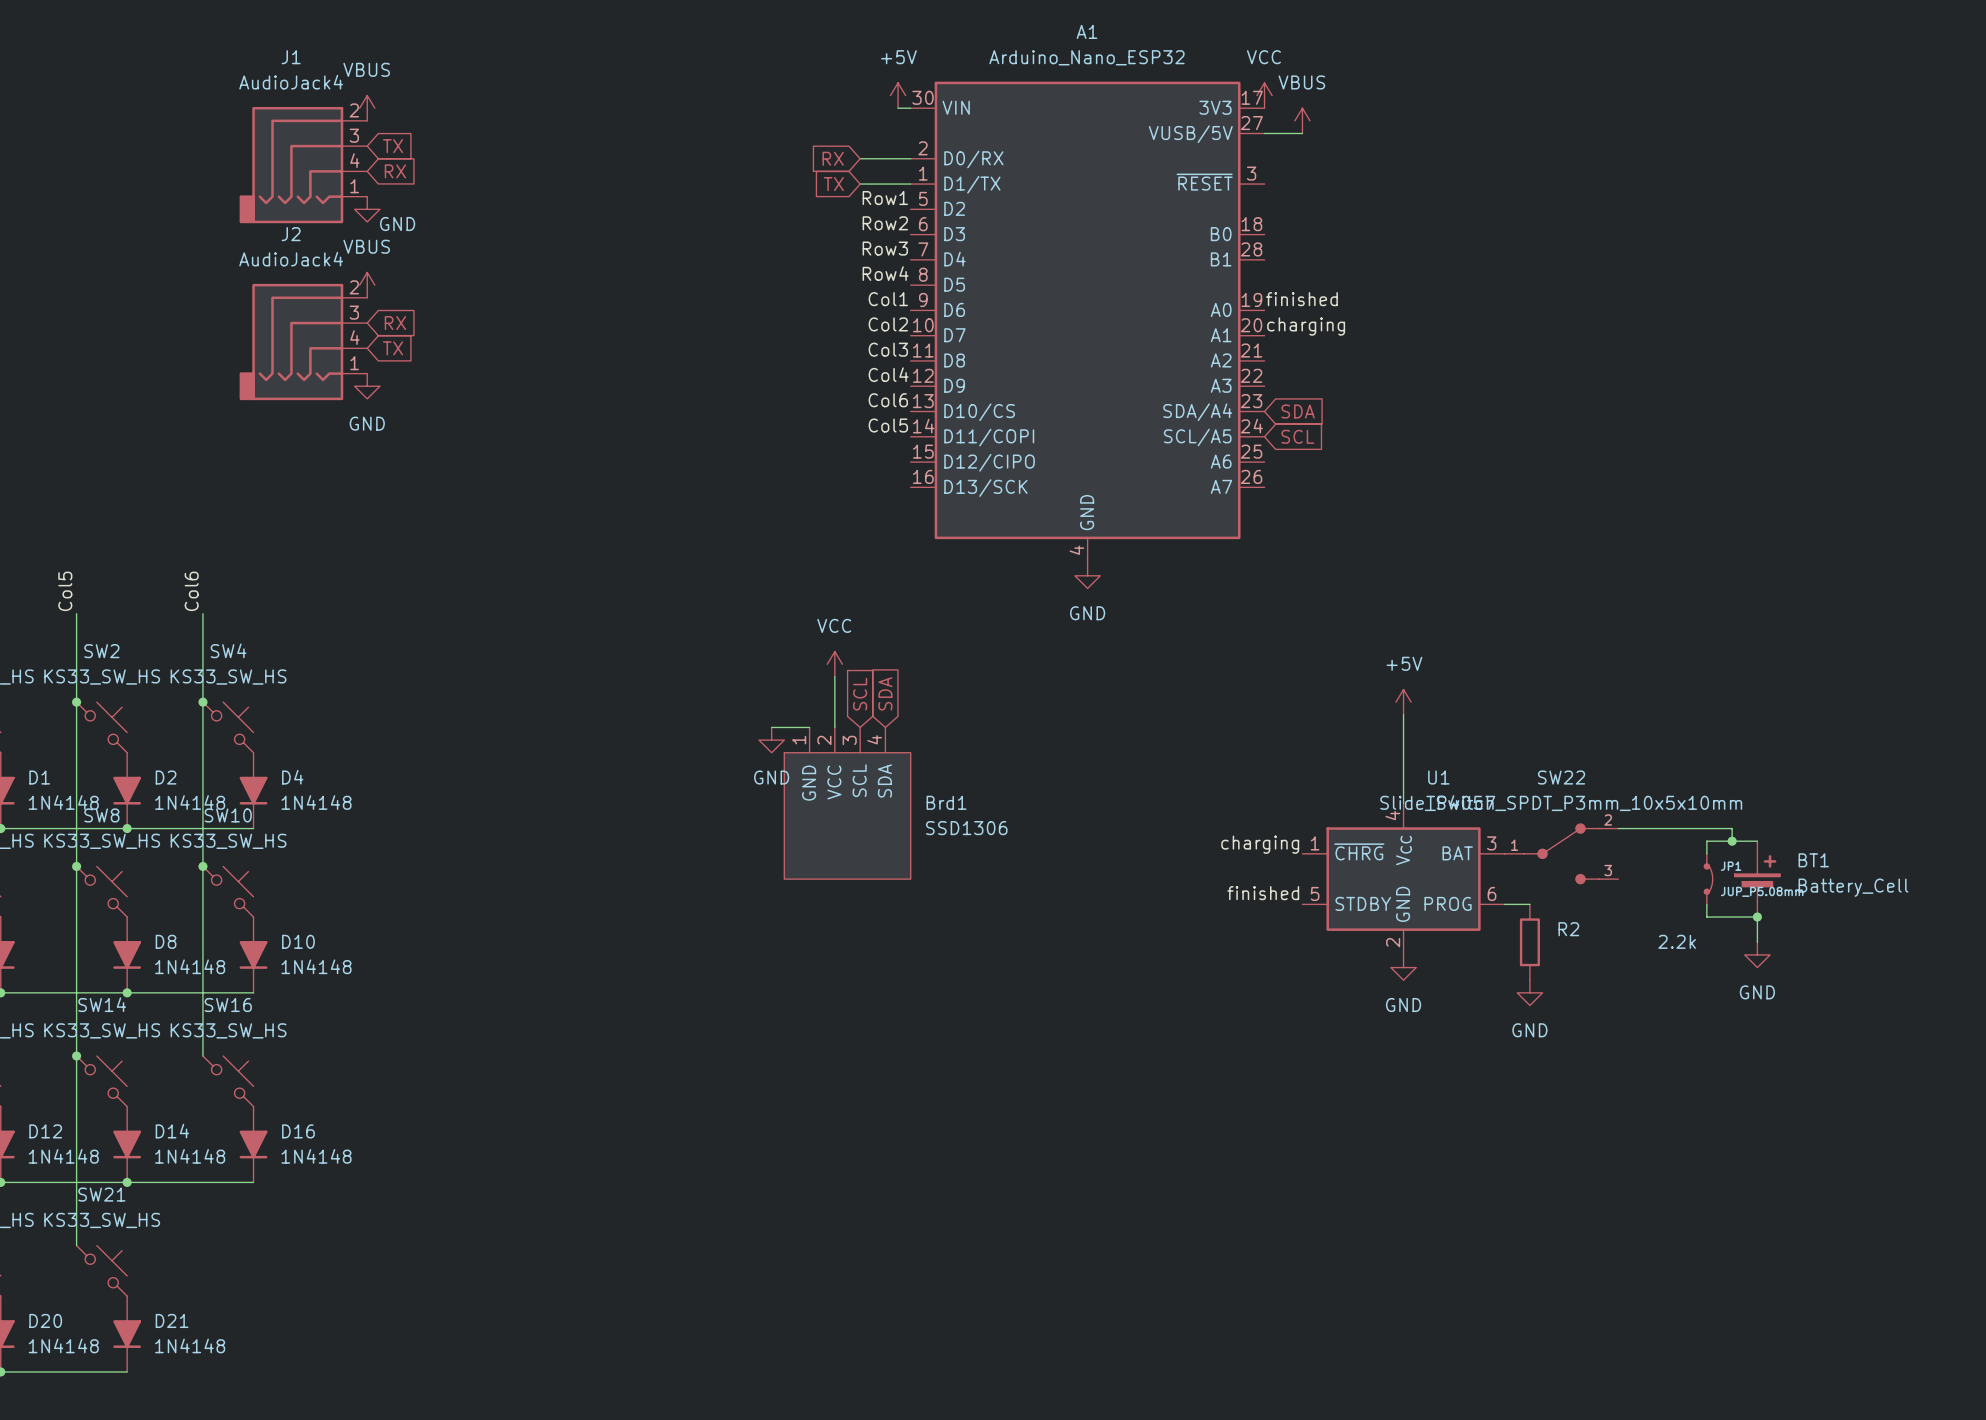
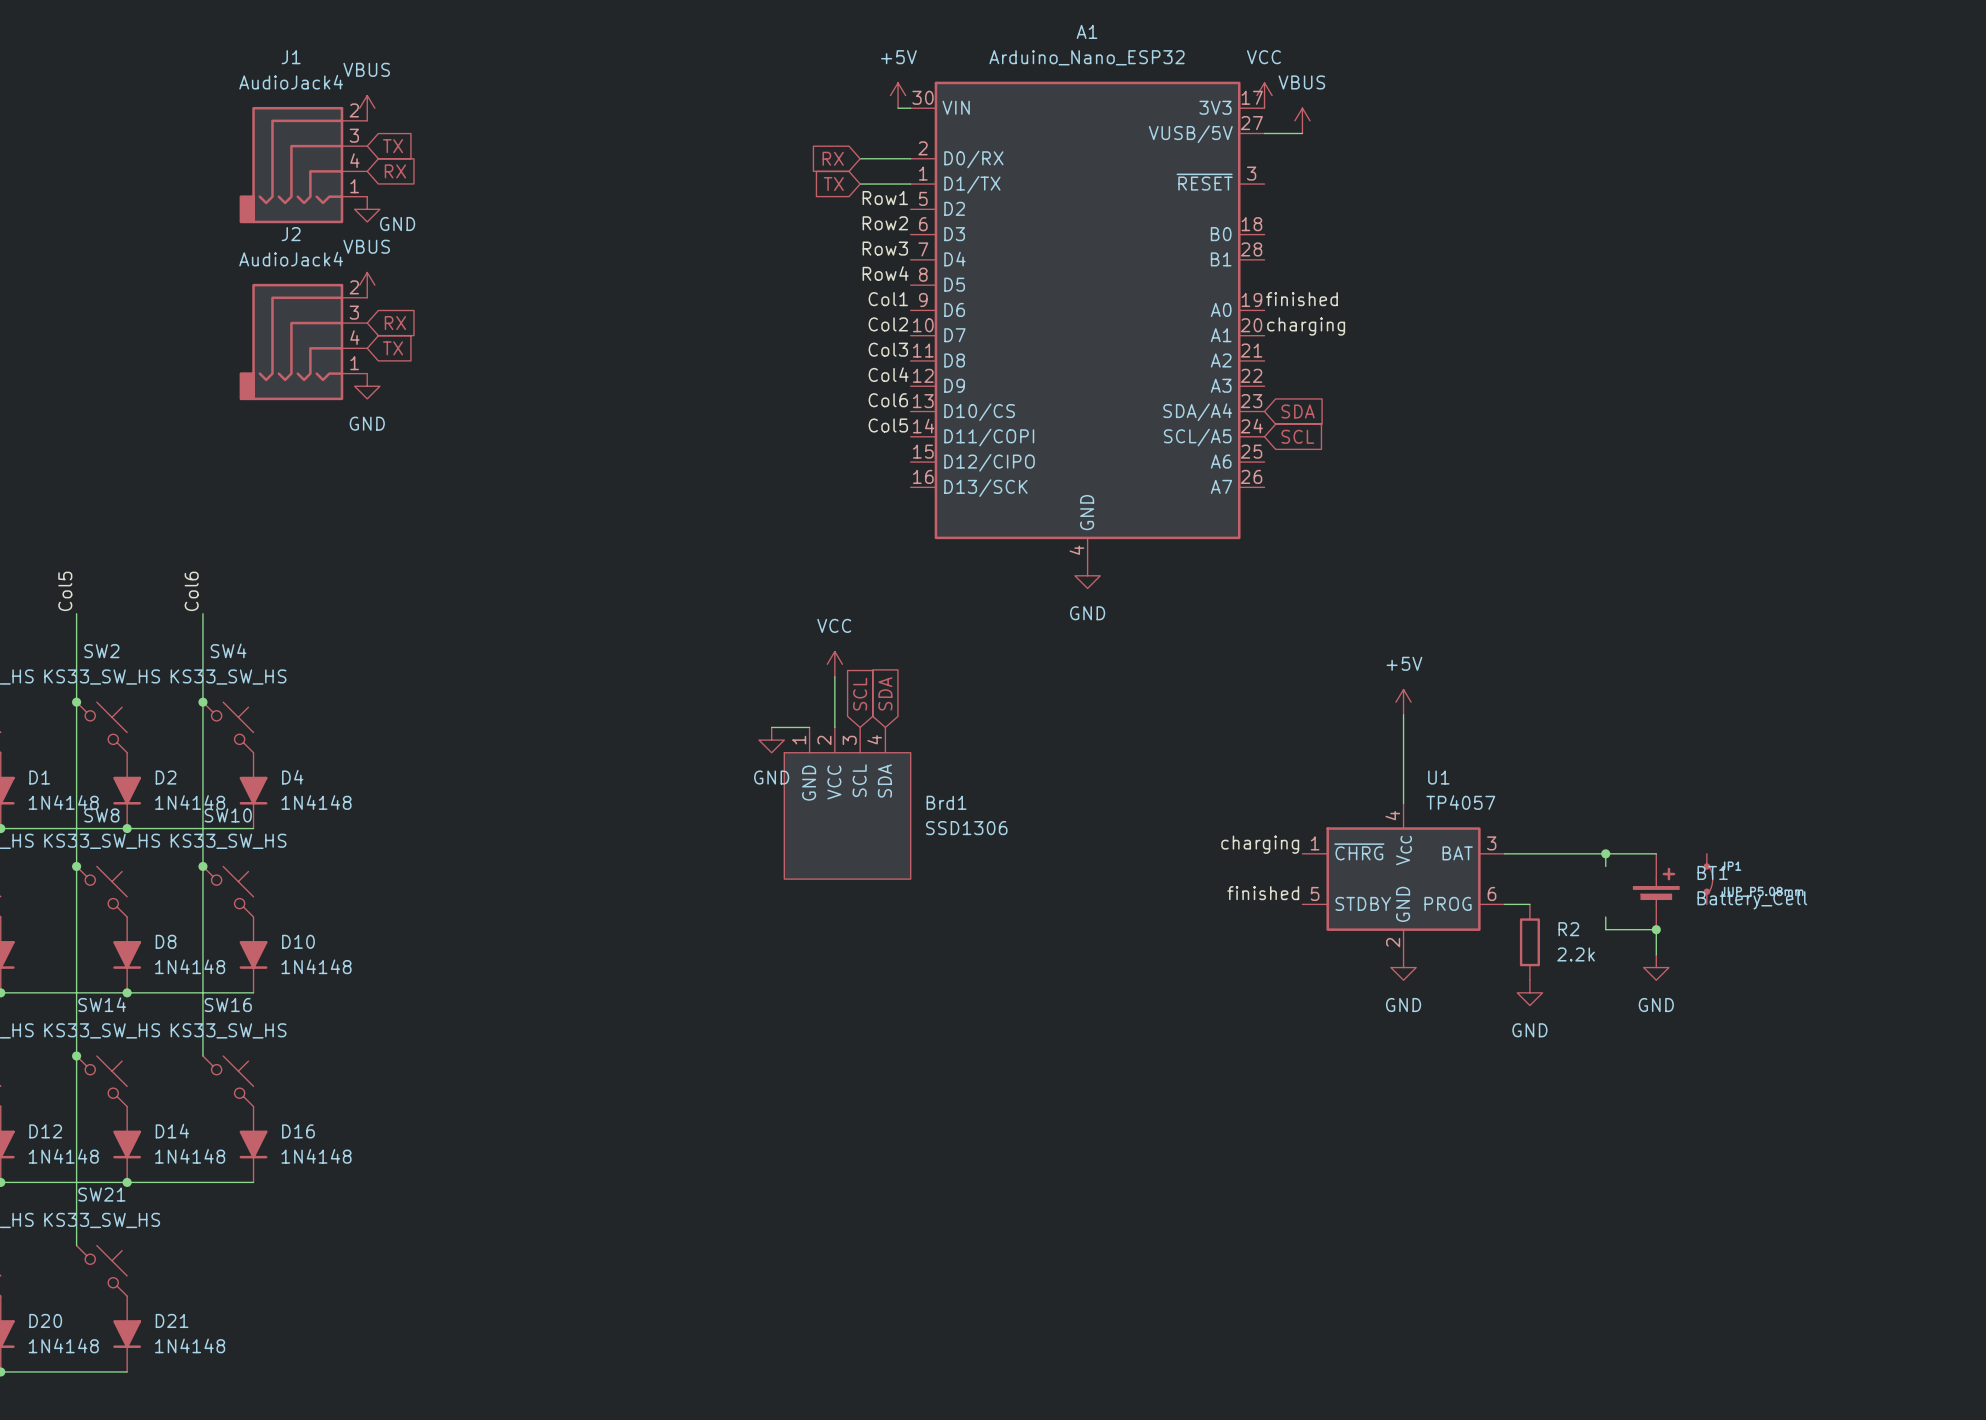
wire: (1618, 828) (1732, 828) (1732, 841) -> none
junction: (1732, 841) -> none
wire: (1757, 841) (1706, 841) (1706, 853) -> none
wire: none -> (1504, 853) (1656, 853)
SW22: Slide_Switch_SPDT_P3mm_10x5x10mm (1561, 853) -> none
wire: none -> (1605, 853) (1605, 866)
junction: none -> (1605, 853)
BT1 position: (1757, 879) -> (1656, 891)
wire: (1706, 904) (1706, 917) (1757, 917) (1757, 942) -> (1605, 917) (1605, 929) (1656, 929) (1656, 954)
junction: (1757, 917) -> none
junction: none -> (1656, 929)
R2 value position: 2.2k (1677, 941) -> 2.2k (1576, 954)
power symbol position: GND (1757, 954) -> GND (1656, 967)

